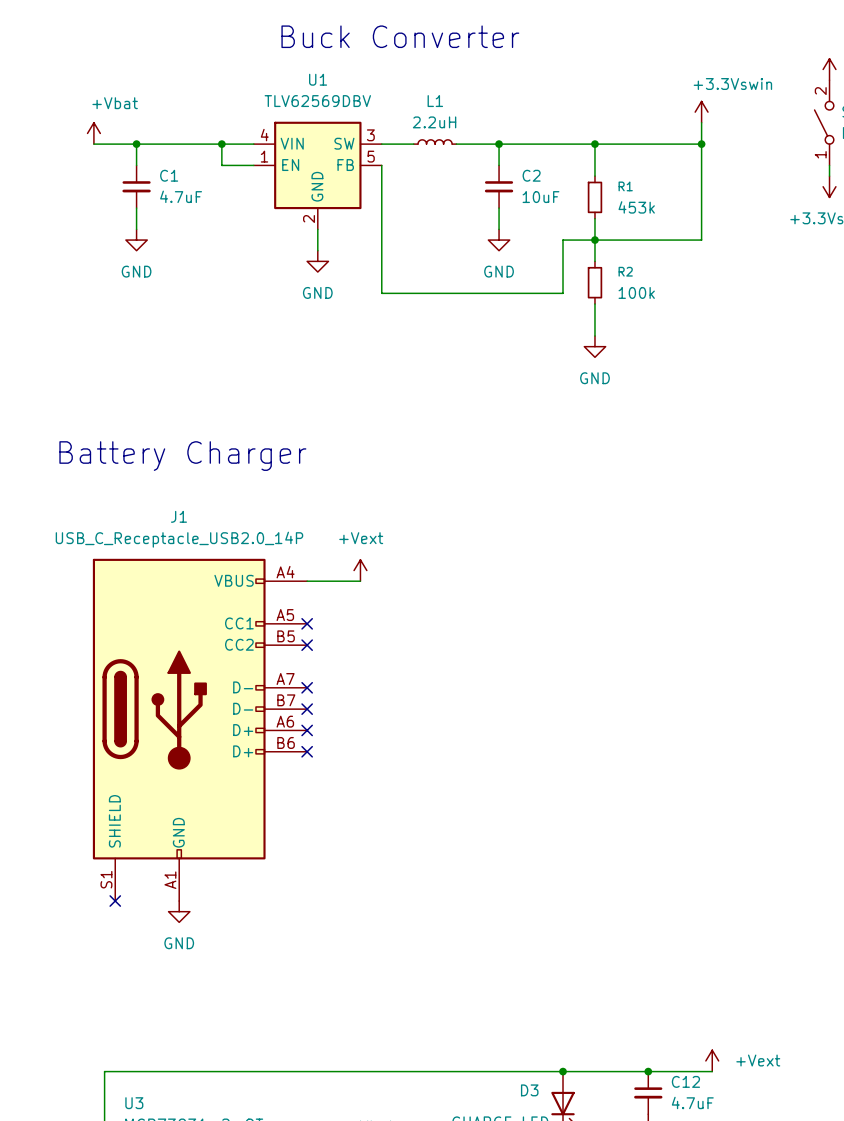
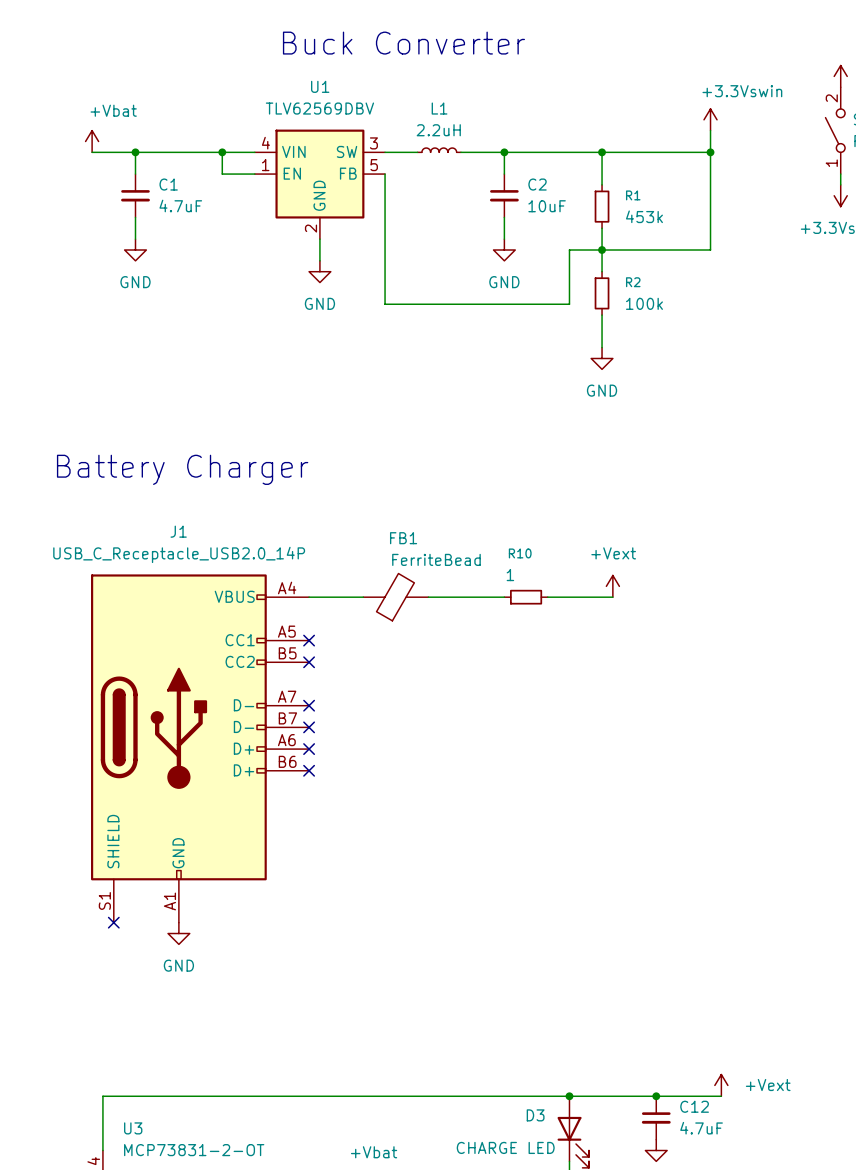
power symbol: +Vext (360, 570) -> none
power symbol: none -> +Vext (612, 586)
FB1: none -> FerriteBead (395, 597)
wire: none -> (428, 597) (504, 597)
R10: none -> 1 (526, 597)
wire: none -> (547, 597) (612, 597)

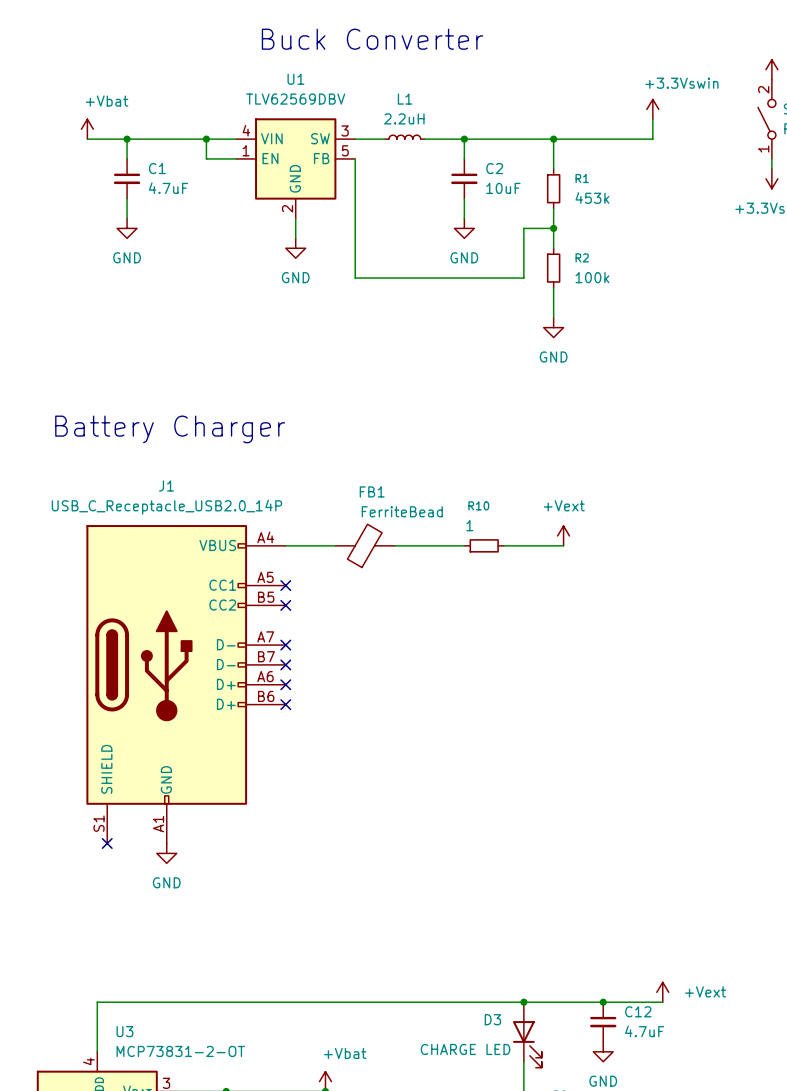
wire: (710, 152) (710, 250) (602, 250) -> none
junction: (710, 152) -> none

